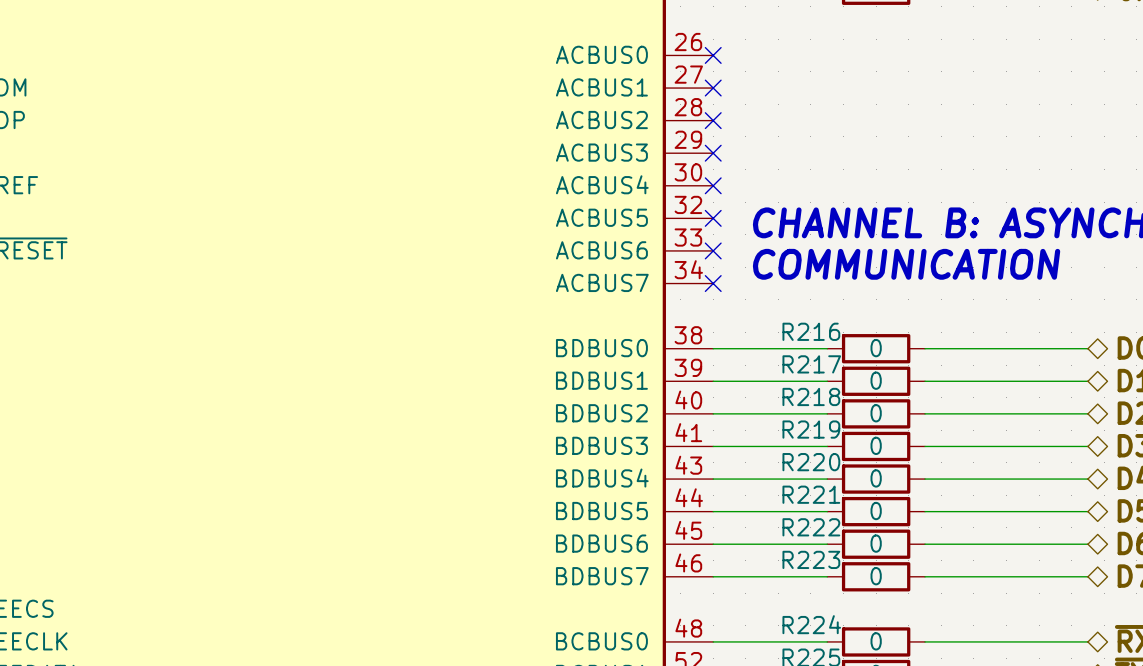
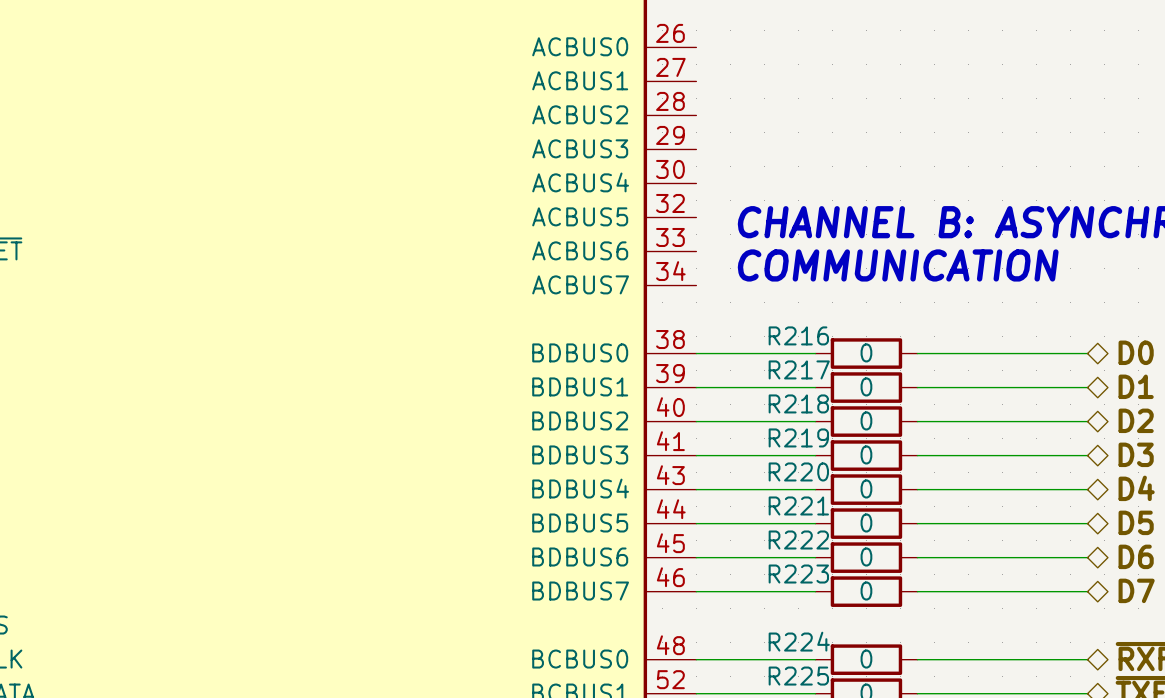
no-connect mark: (713, 55) -> none
no-connect mark: (713, 88) -> none
no-connect mark: (713, 120) -> none
no-connect mark: (713, 153) -> none
no-connect mark: (713, 185) -> none
no-connect mark: (713, 218) -> none
no-connect mark: (713, 250) -> none
no-connect mark: (713, 283) -> none

